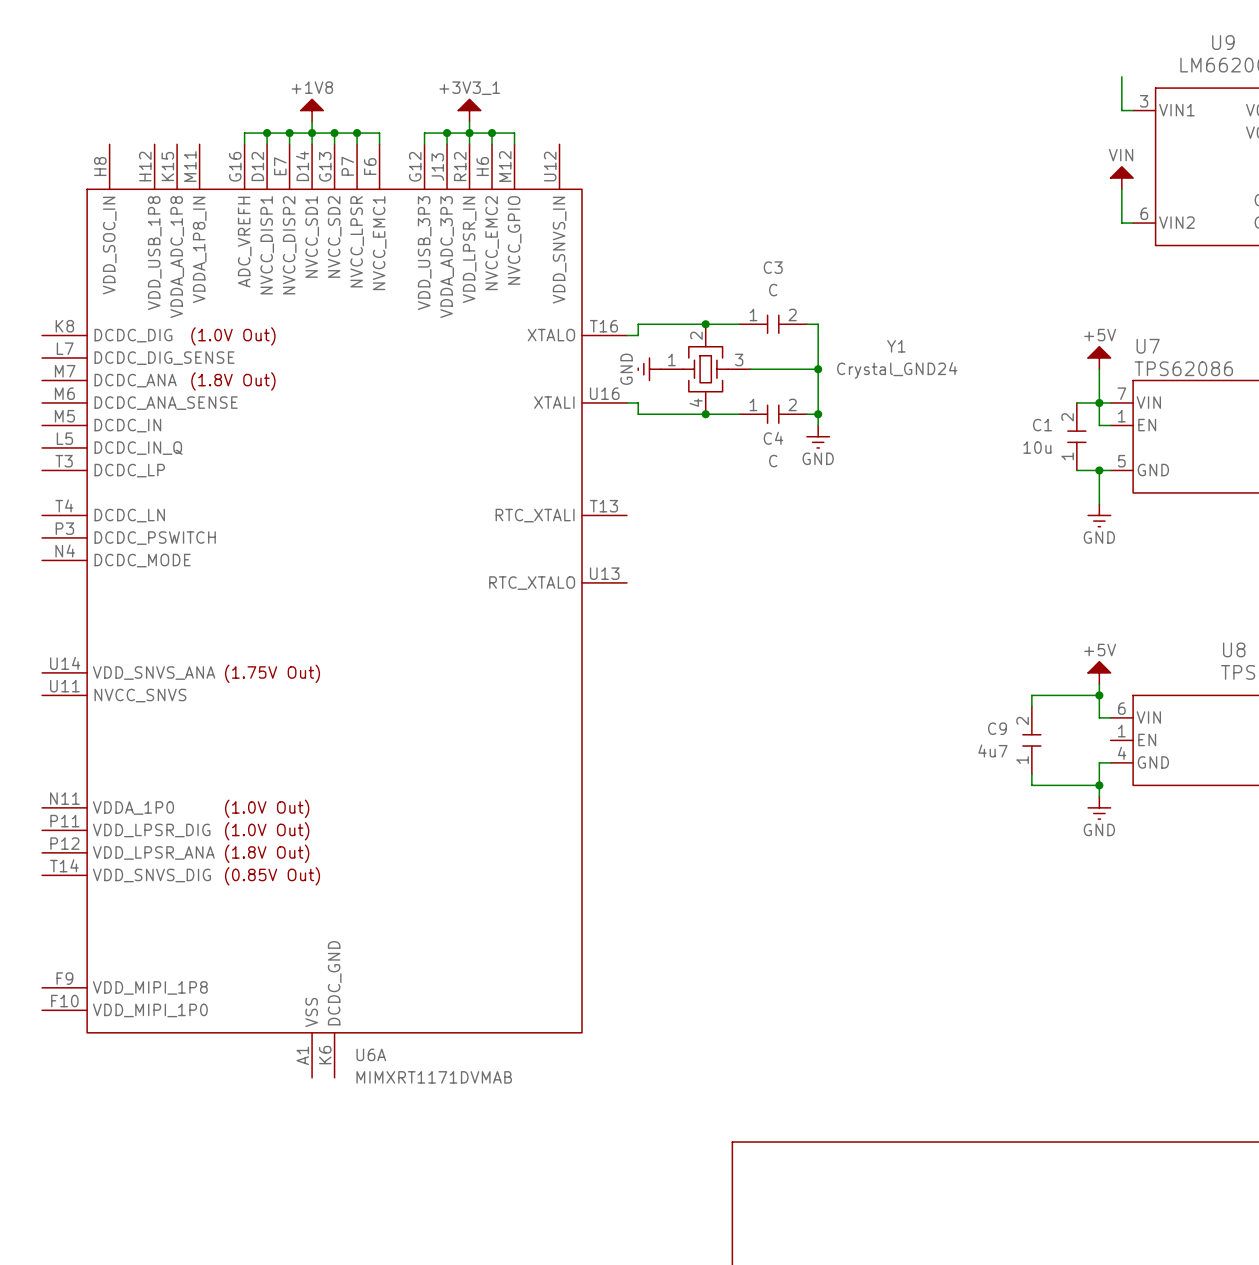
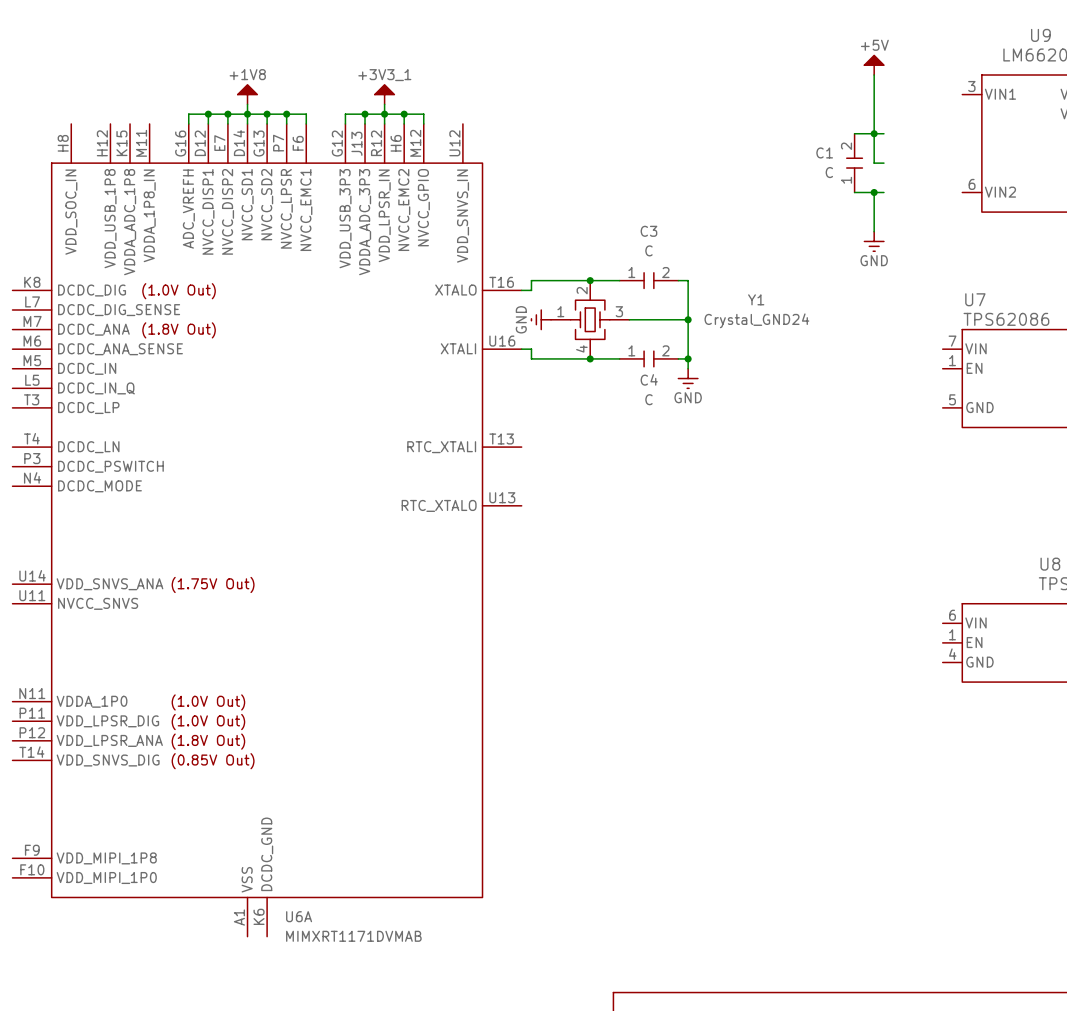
power symbol: none -> +5V (874, 65)
wire: (1121, 76) (1121, 110) (1133, 110) -> none
wire: none -> (874, 75) (874, 163) (883, 163)
wire: none -> (854, 133) (883, 133)
junction: none -> (874, 133)
power symbol: VIN (1121, 178) -> none
wire: (1121, 189) (1121, 223) (1133, 223) -> none
wire: none -> (874, 192) (874, 231)
junction: none -> (874, 192)
power symbol: none -> GND (874, 241)
power symbol: +5V (1099, 358) -> none
wire: (1099, 369) (1099, 425) (1110, 425) -> none
wire: (1076, 402) (1110, 402) -> (854, 192) (883, 192)
junction: (1099, 402) -> none
C1 position: (1076, 436) -> (854, 163)
C1 value: 10u (1037, 447) -> C (829, 172)
wire: (1076, 470) (1110, 470) -> none
wire: (1099, 470) (1099, 504) -> none
junction: (1099, 470) -> none
power symbol: GND (1099, 515) -> none
power symbol: +5V (1099, 672) -> none
wire: (1099, 684) (1099, 717) (1110, 717) -> none
wire: (1099, 695) (1031, 695) (1031, 706) -> none
junction: (1099, 695) -> none
C9: 4u7 (1031, 740) -> none
wire: (1110, 762) (1099, 762) (1099, 796) -> none
wire: (1031, 774) (1031, 785) (1099, 785) -> none
junction: (1099, 785) -> none
power symbol: GND (1099, 807) -> none

